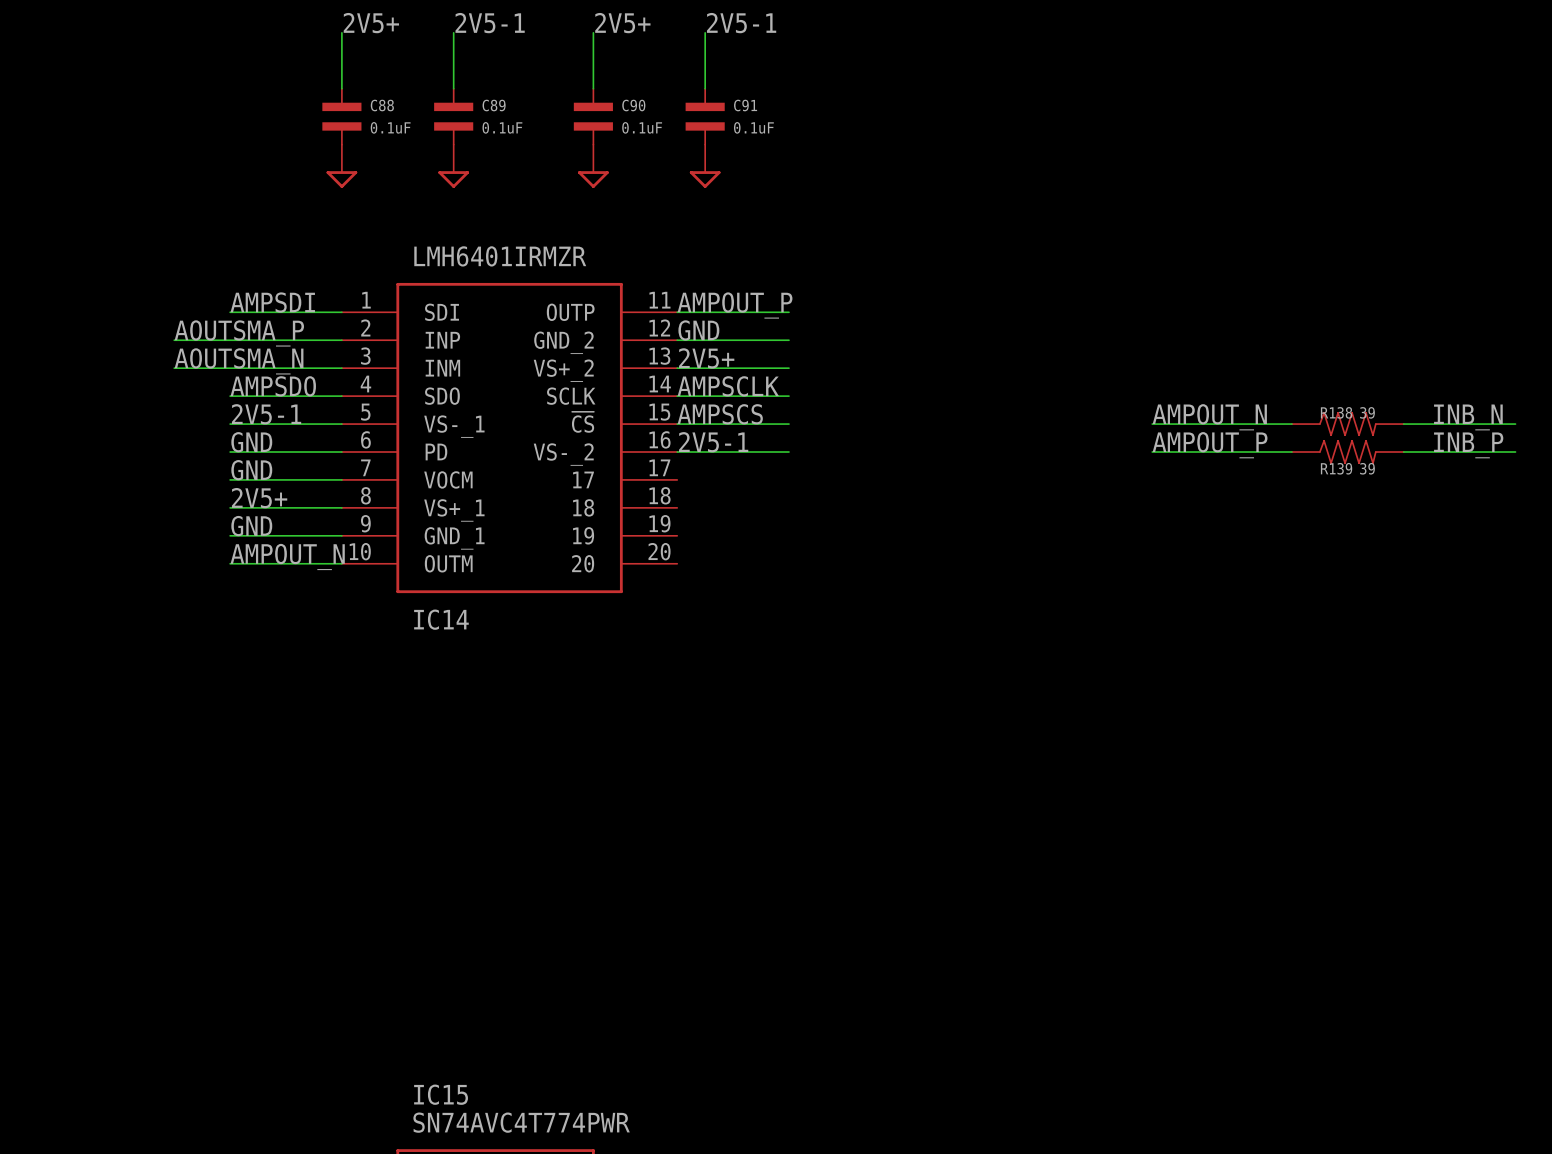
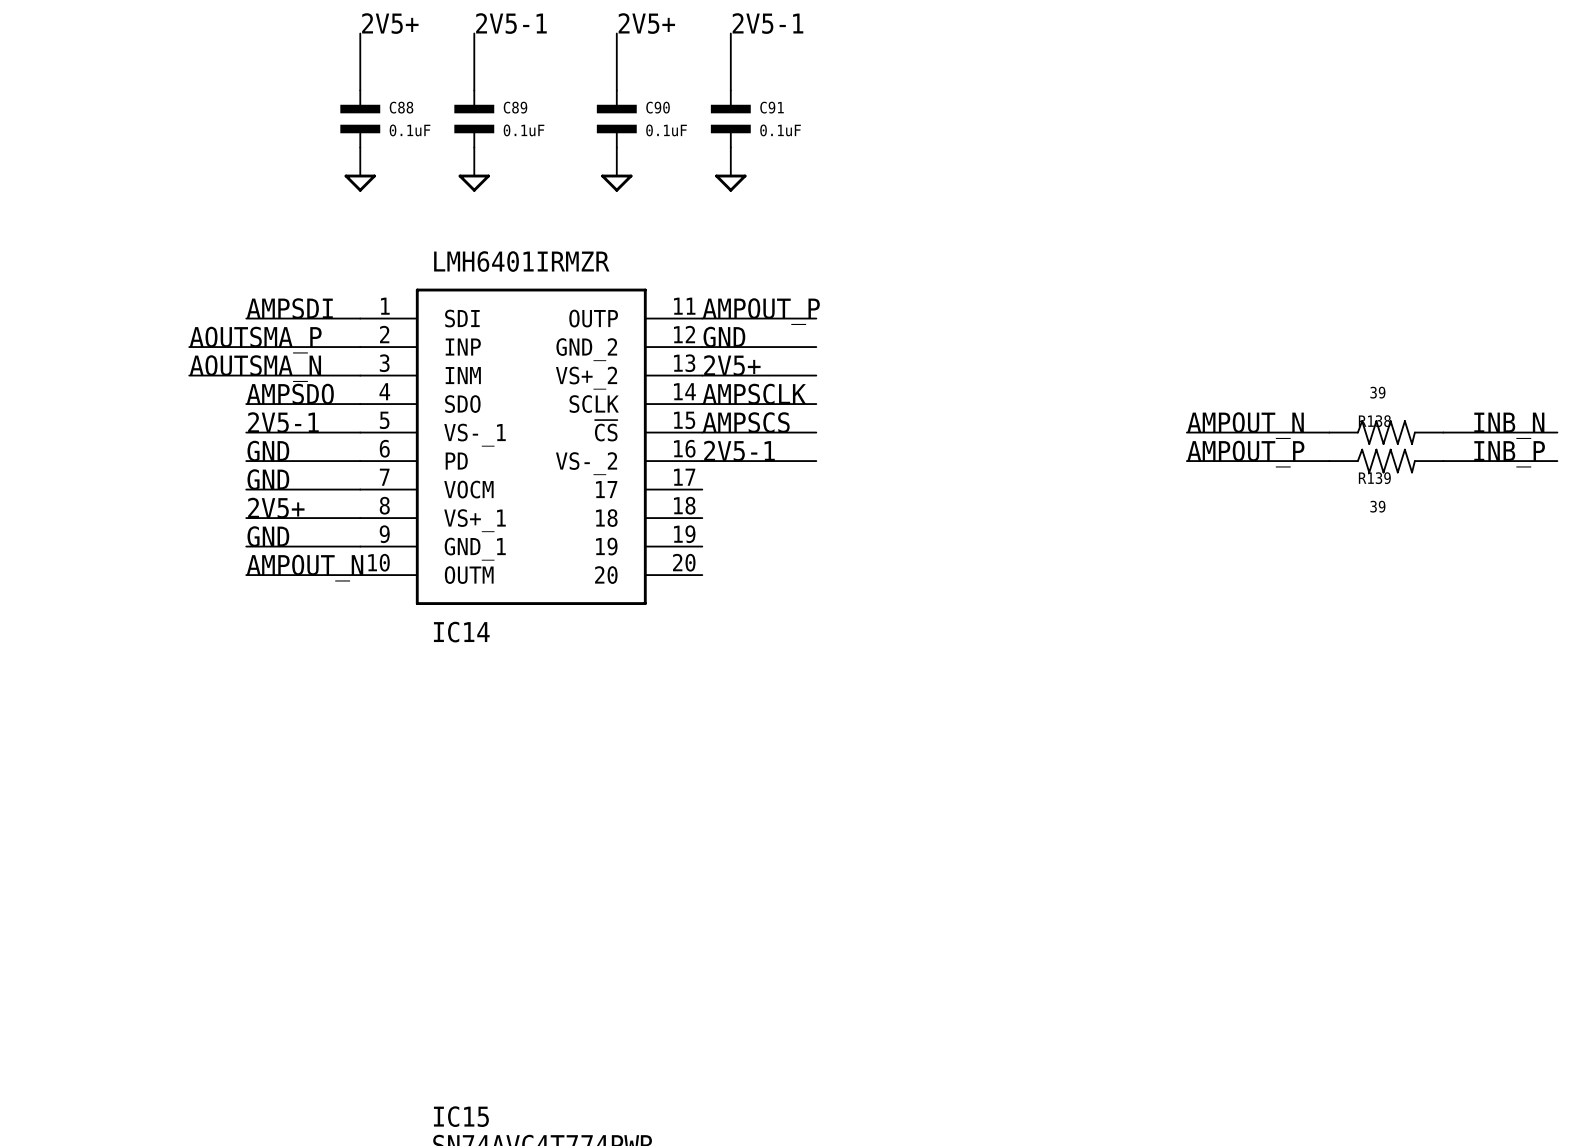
R138 value position: 39 (1367, 412) -> 39 (1377, 392)
R139 value position: 39 (1367, 468) -> 39 (1377, 506)

